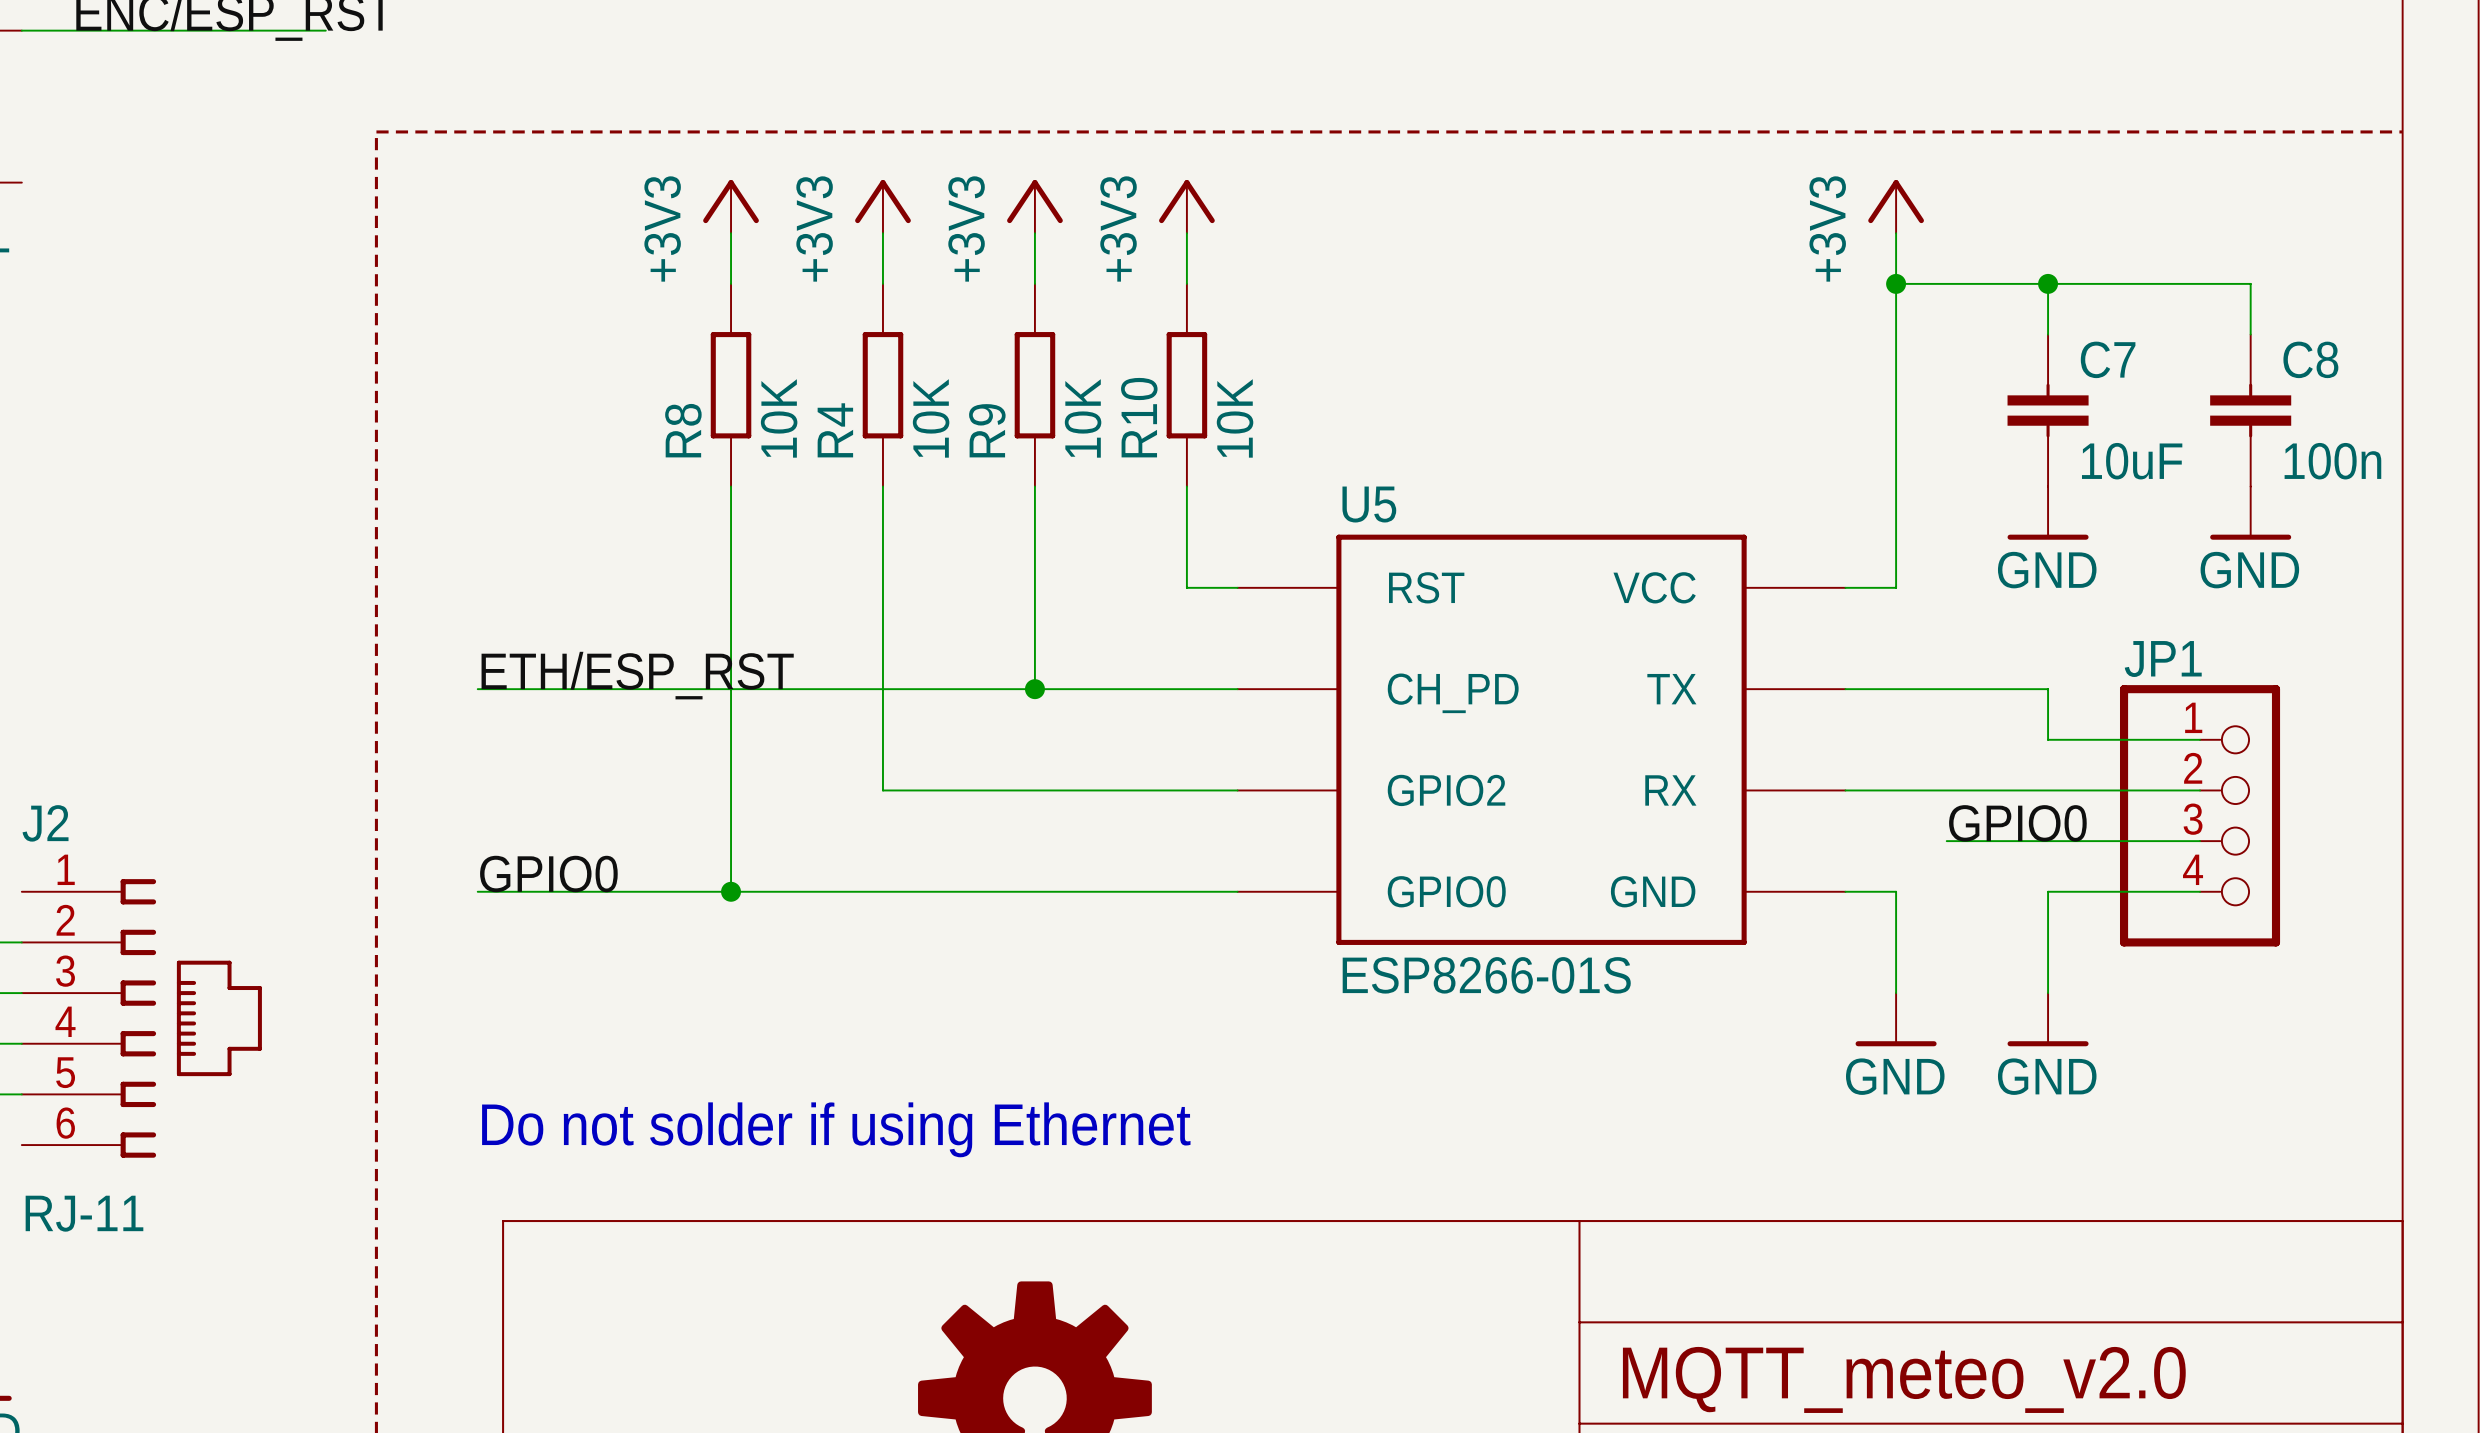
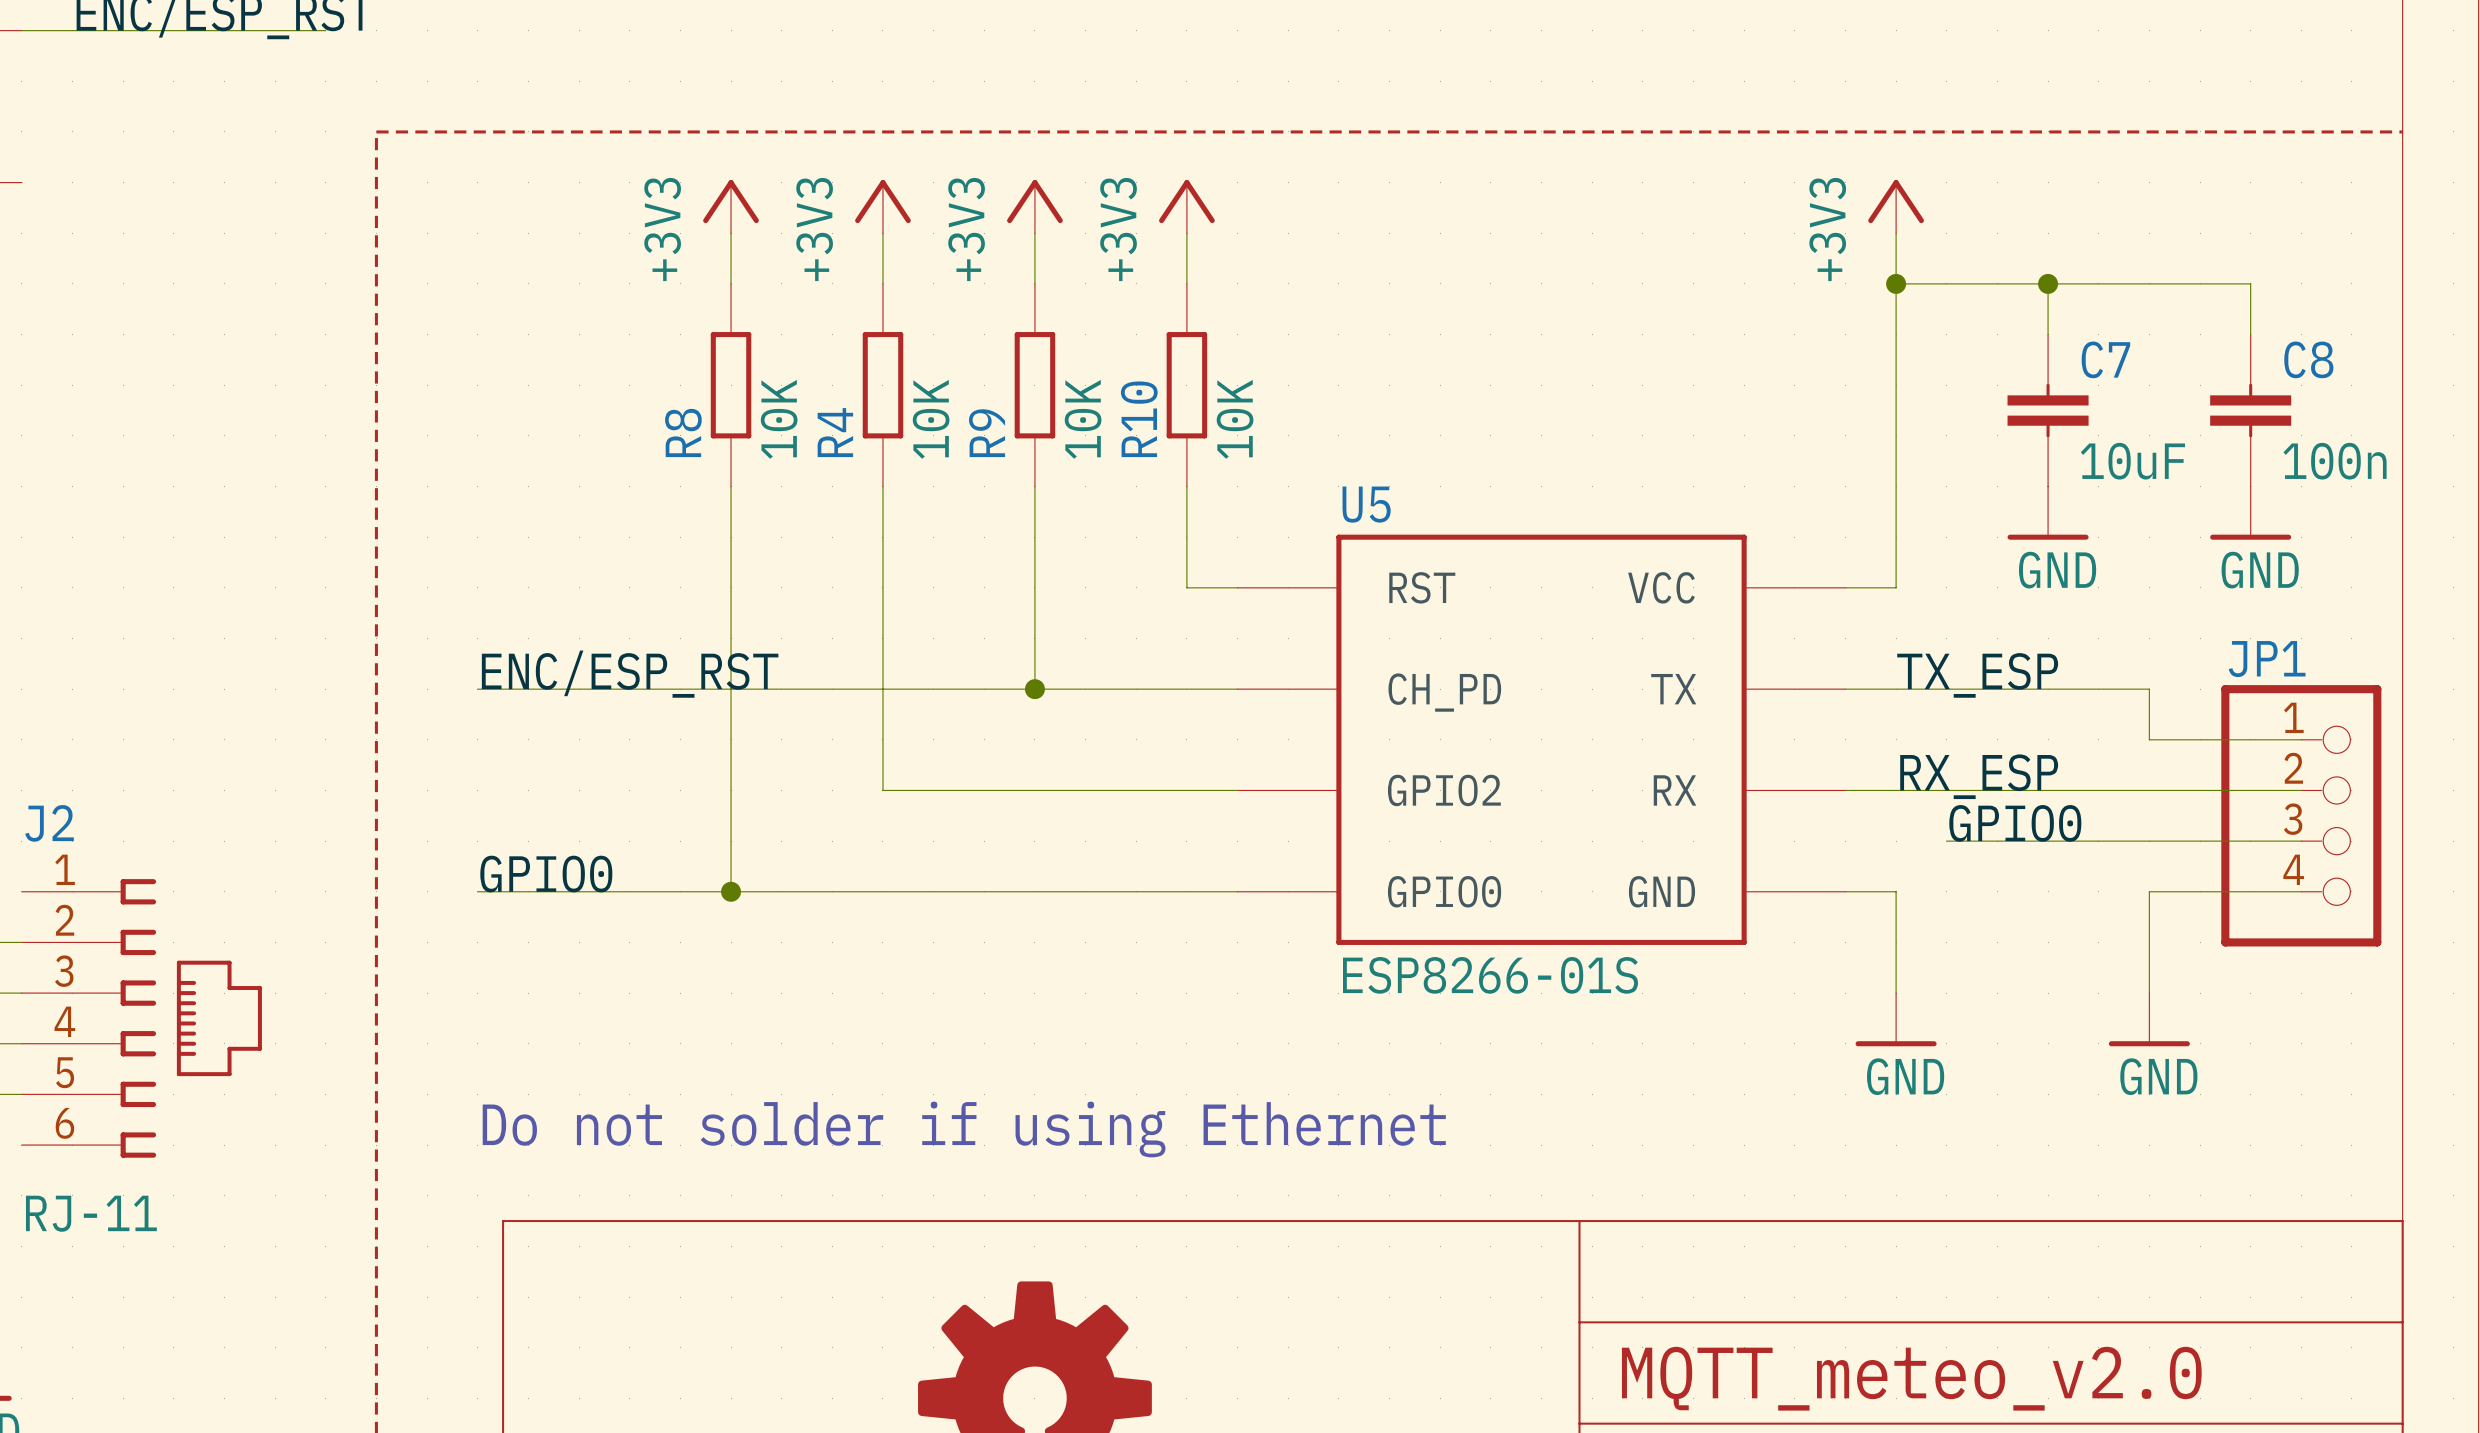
label: ETH/ESP_RST (637, 675) -> ENC/ESP_RST (630, 674)
label: none -> TX_ESP (1977, 675)
wire: (2048, 689) (2048, 739) (2149, 739) -> (2048, 689) (2149, 689) (2149, 739)
wire: none -> (2200, 739) (2301, 739)
label: none -> RX_ESP (1979, 776)
wire: none -> (2200, 790) (2301, 790)
JP1 position: (2200, 815) -> (2301, 815)
wire: none -> (2200, 841) (2301, 841)
wire: (2149, 891) (2048, 891) (2048, 993) -> (2149, 891) (2149, 993)
wire: none -> (2200, 891) (2301, 891)
power symbol position: GND (2048, 1019) -> GND (2149, 1019)

